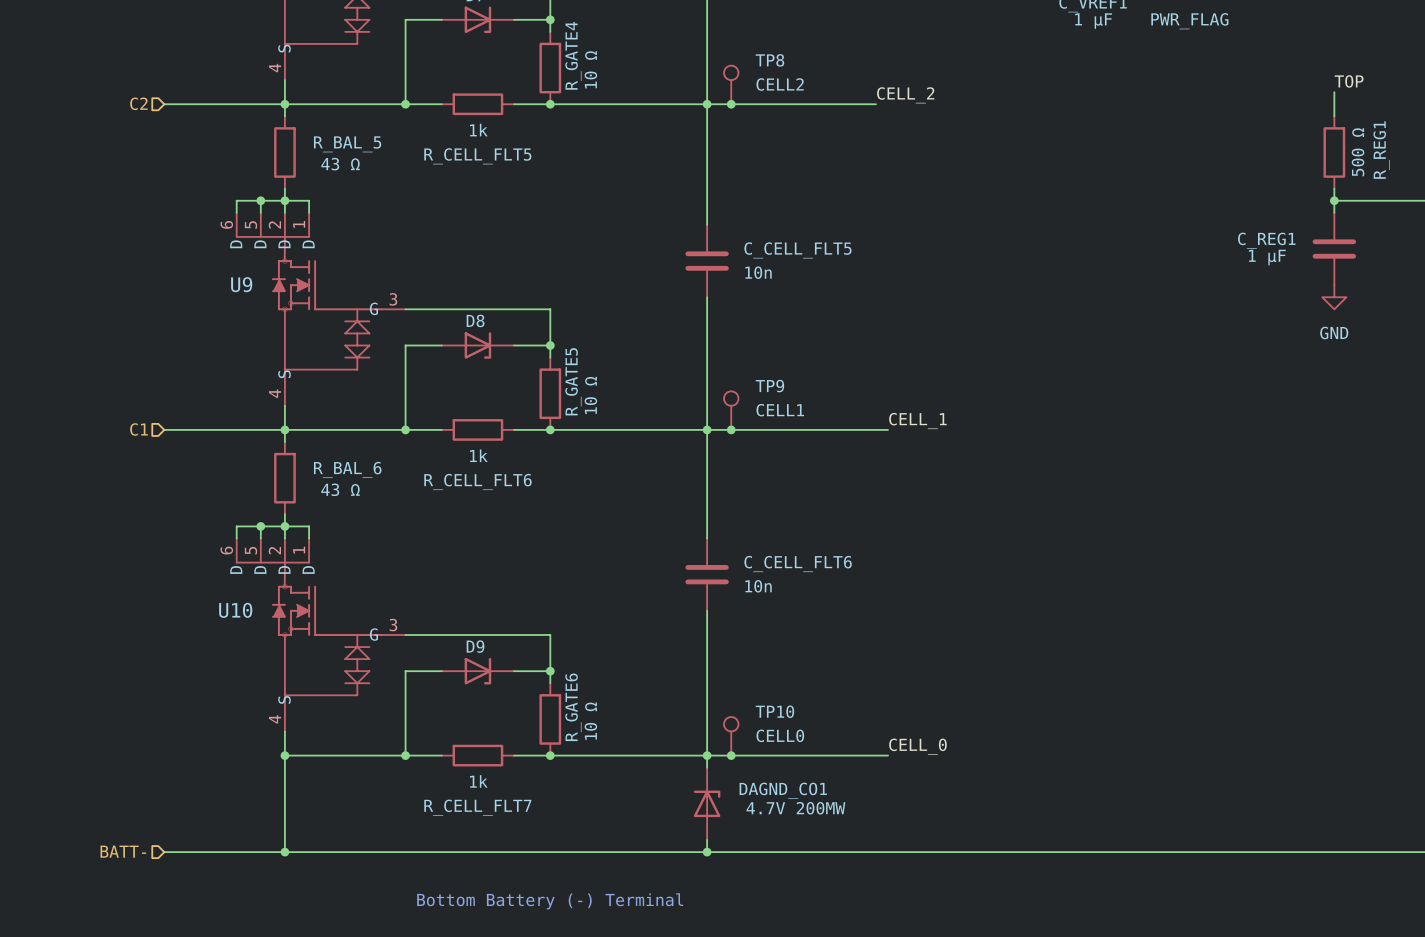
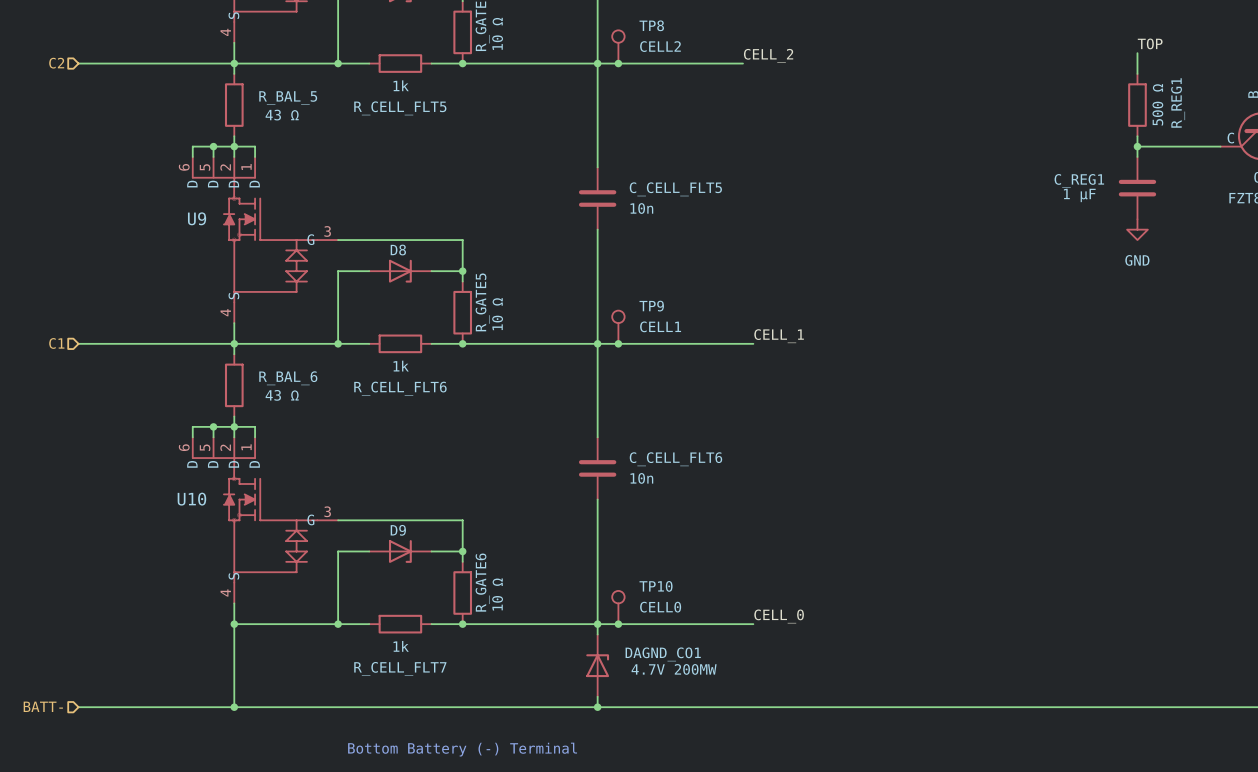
hierarchical label position: C2 (138, 103) -> C2 (56, 63)
wire: none -> (78, 63) (130, 63)
wire: none -> (78, 343) (130, 343)
hierarchical label position: C1 (139, 429) -> C1 (56, 343)
hierarchical label position: BATT- (123, 851) -> BATT- (43, 706)
wire: none -> (78, 707) (130, 707)

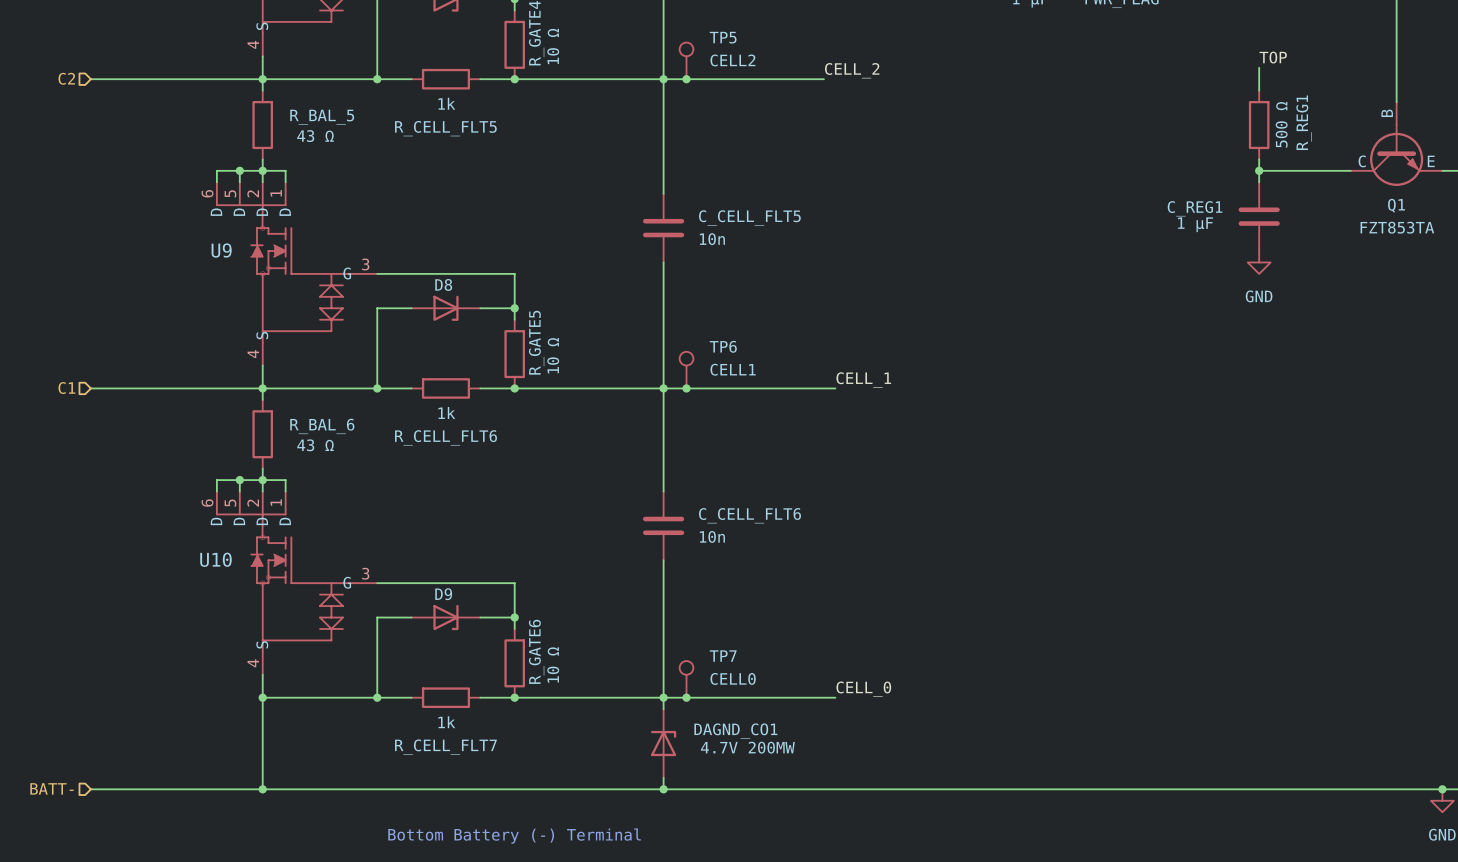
TP8 name: TP8 (651, 25) -> TP5 (723, 37)
TP9 name: TP9 (651, 306) -> TP6 (723, 346)
TP10 name: TP10 (656, 586) -> TP7 (723, 656)

